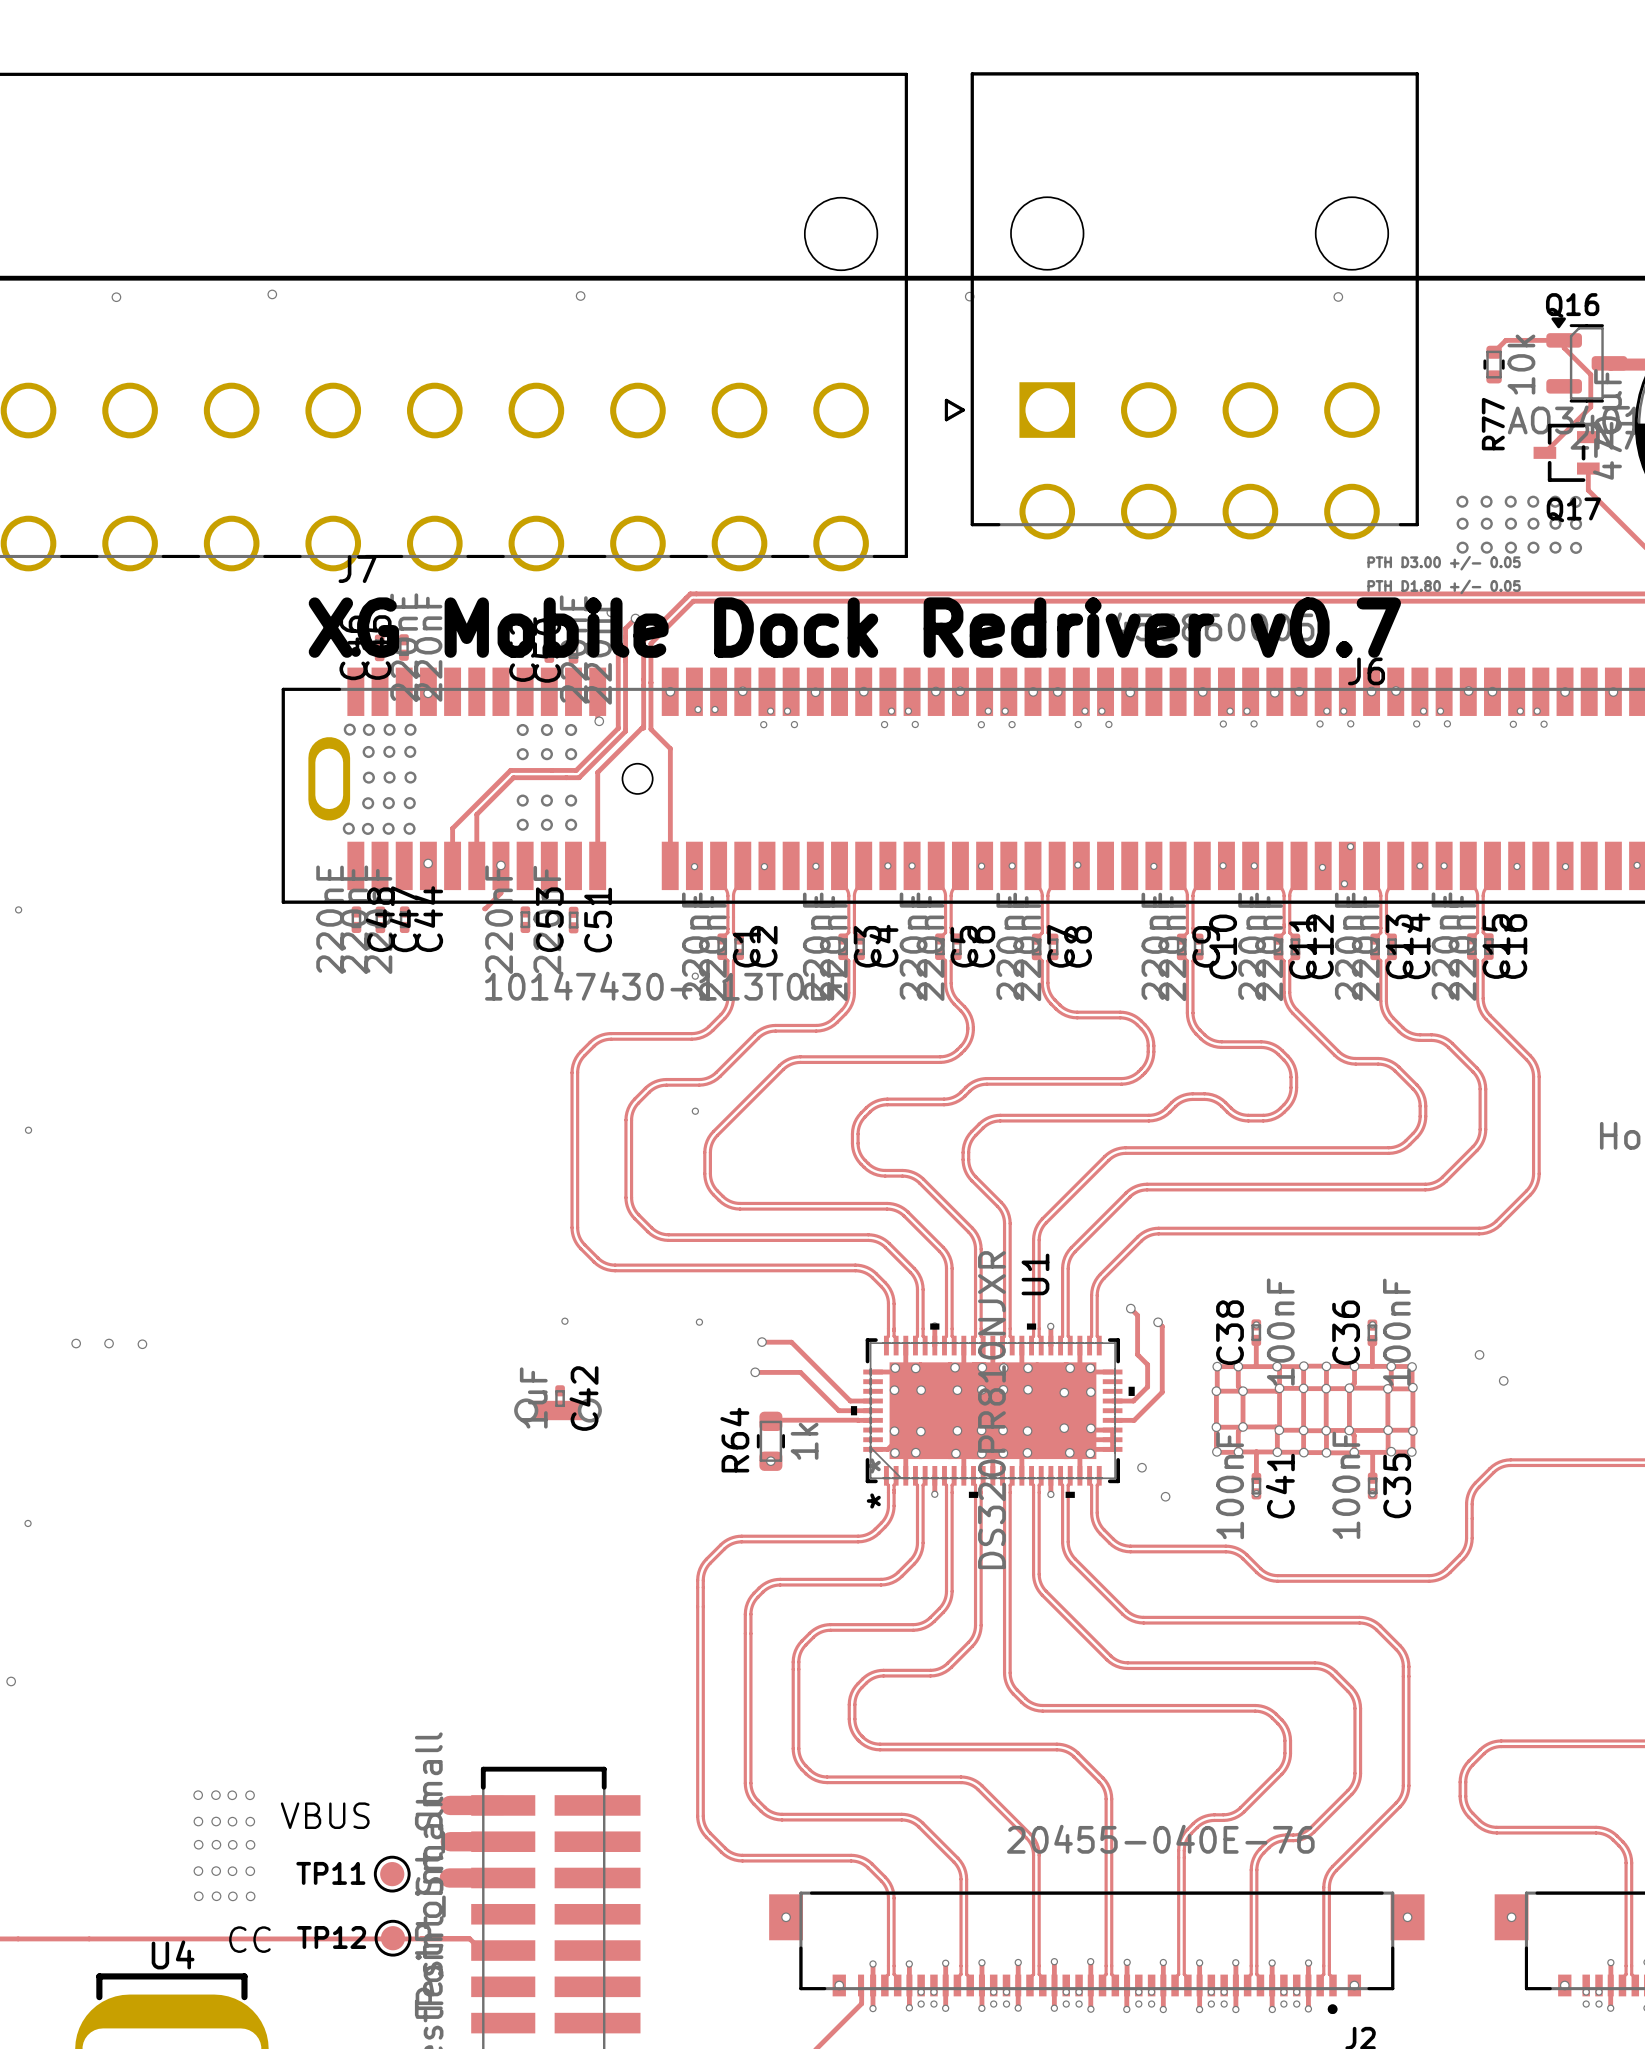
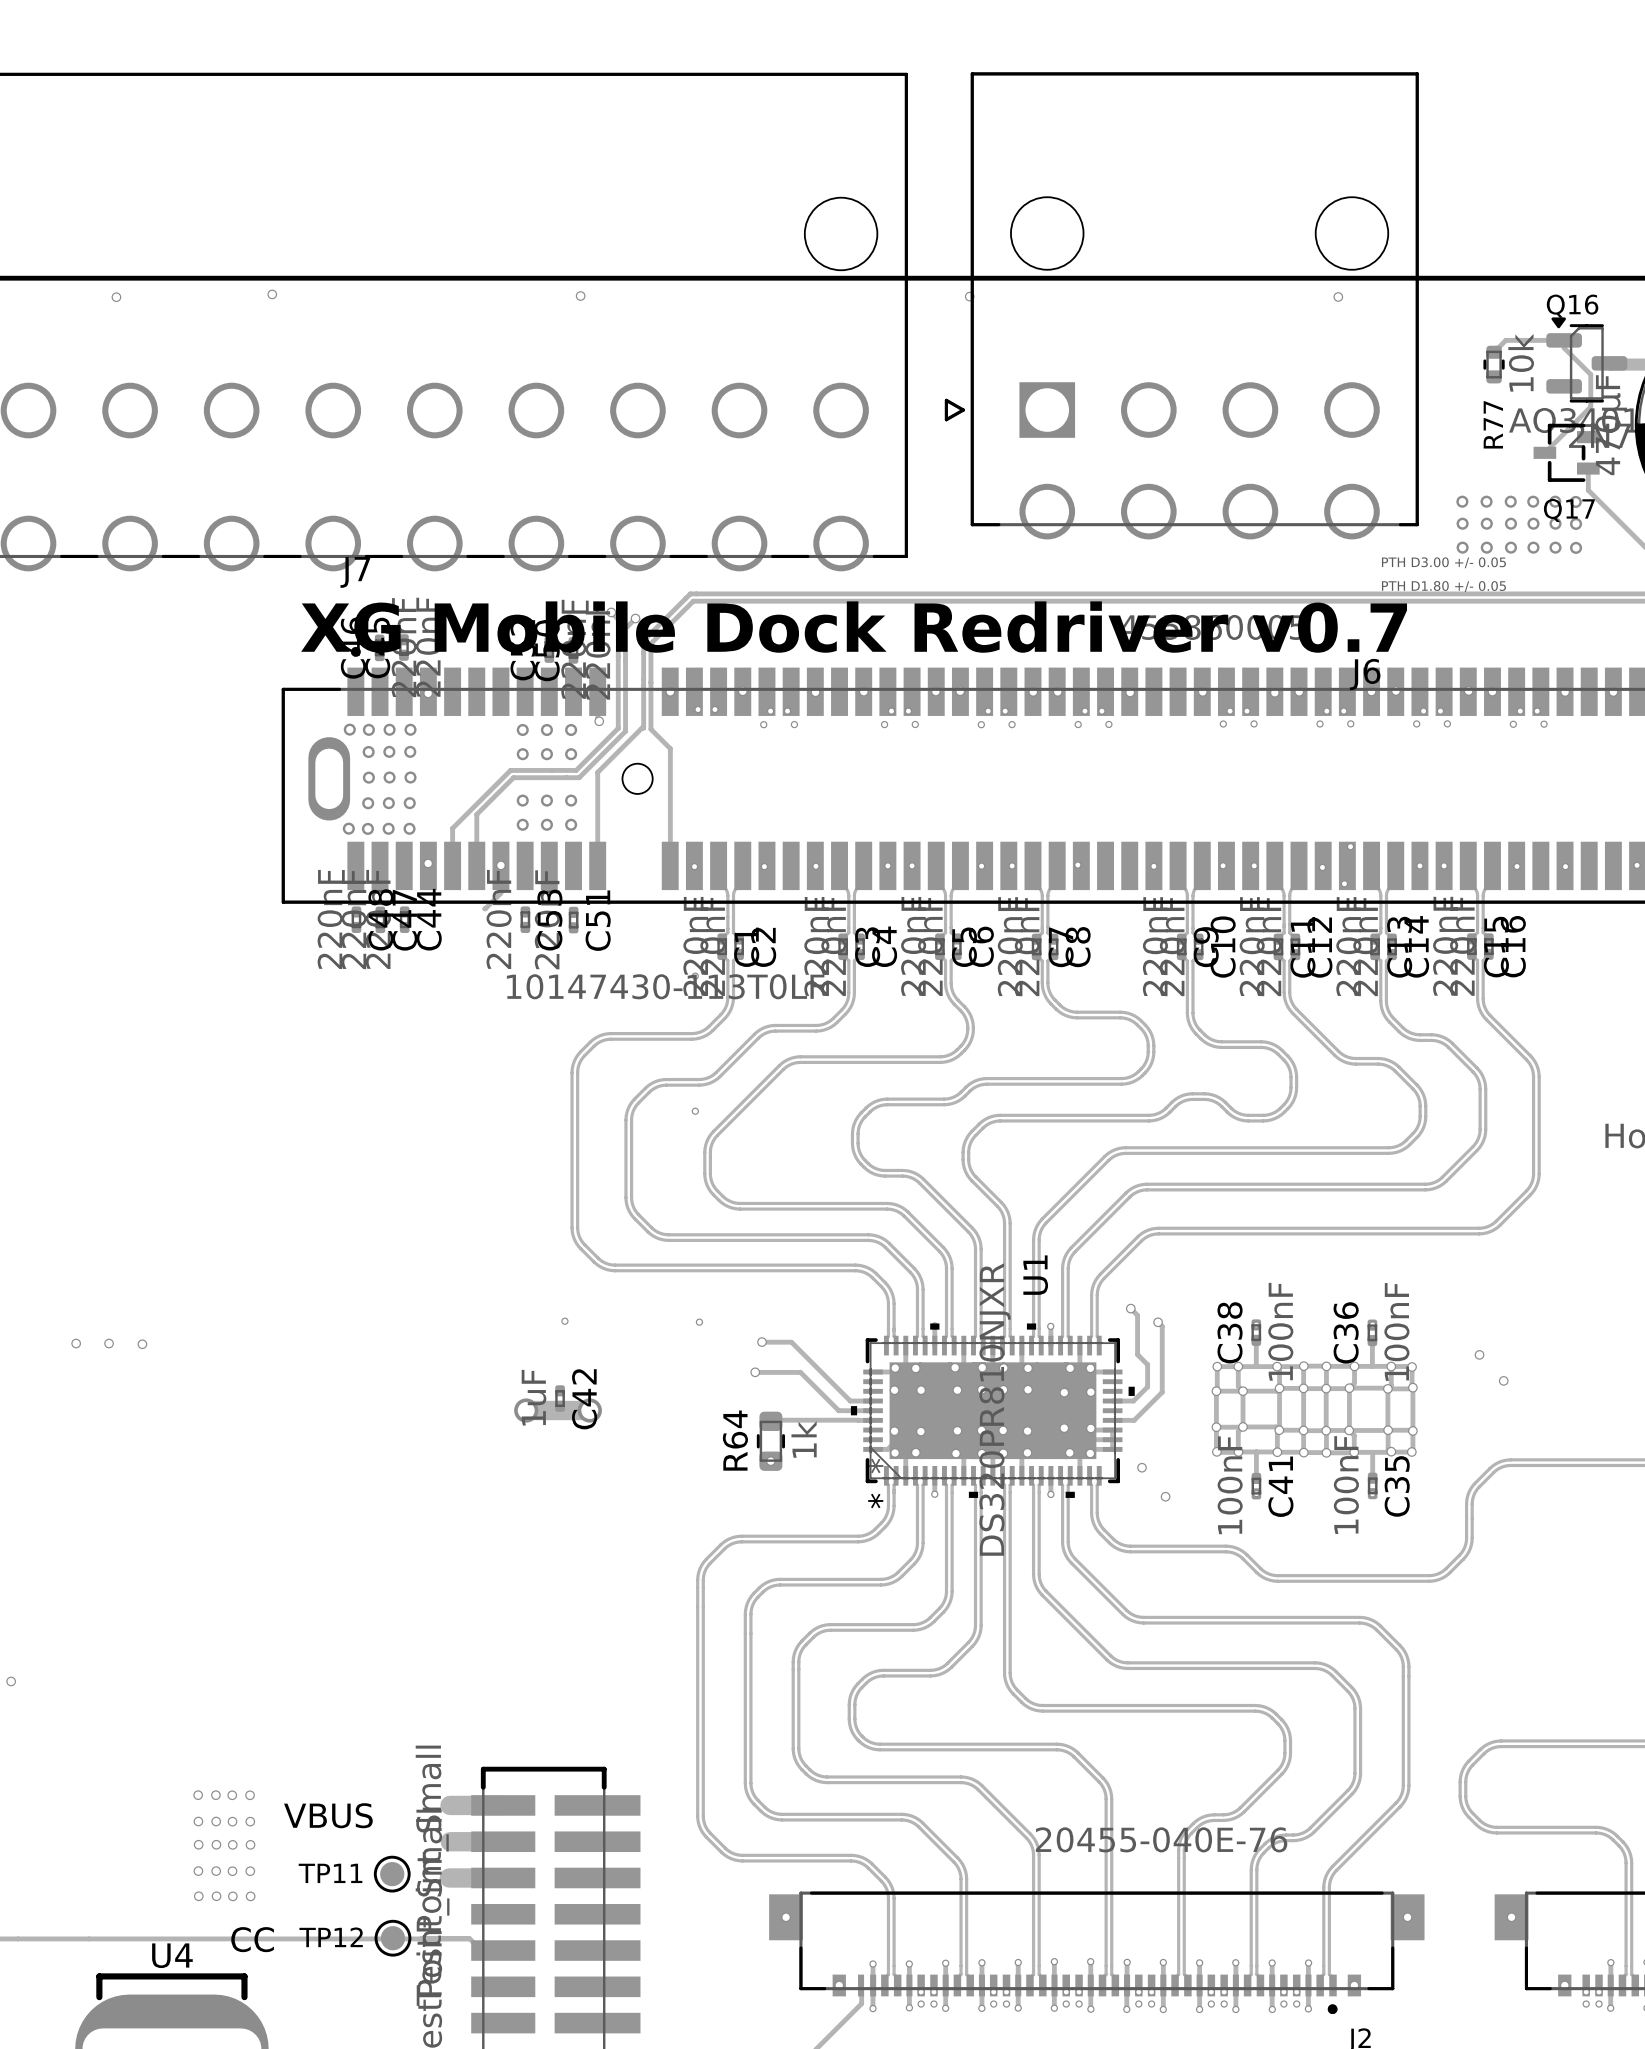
via: (18, 909) -> none
via: (28, 1130) -> none
via: (28, 1523) -> none

